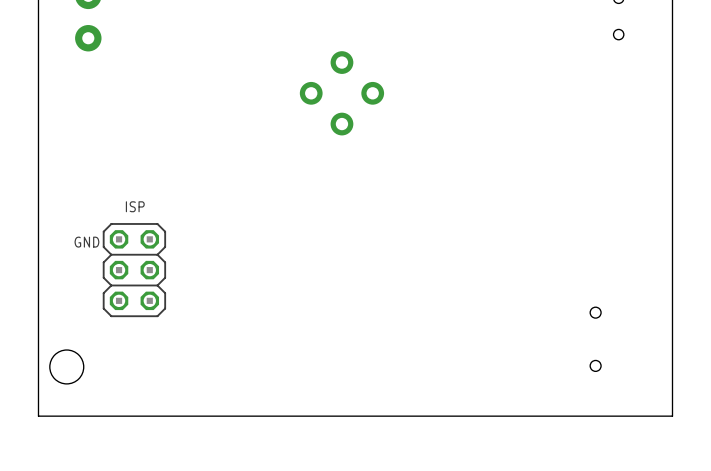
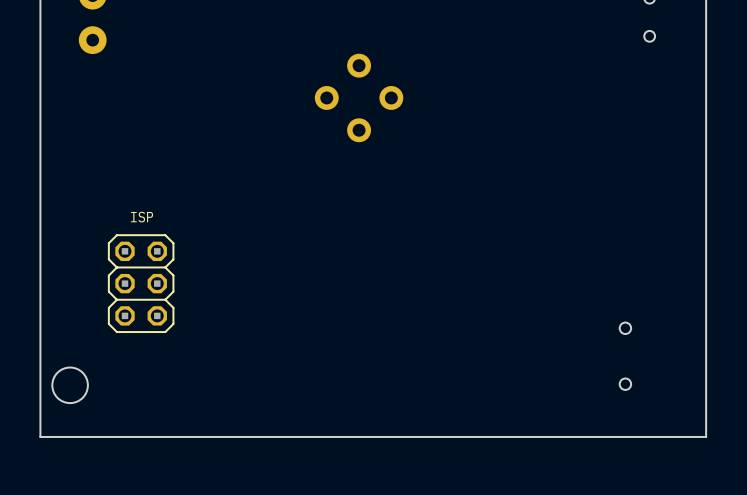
text: GND (86, 242) -> none

